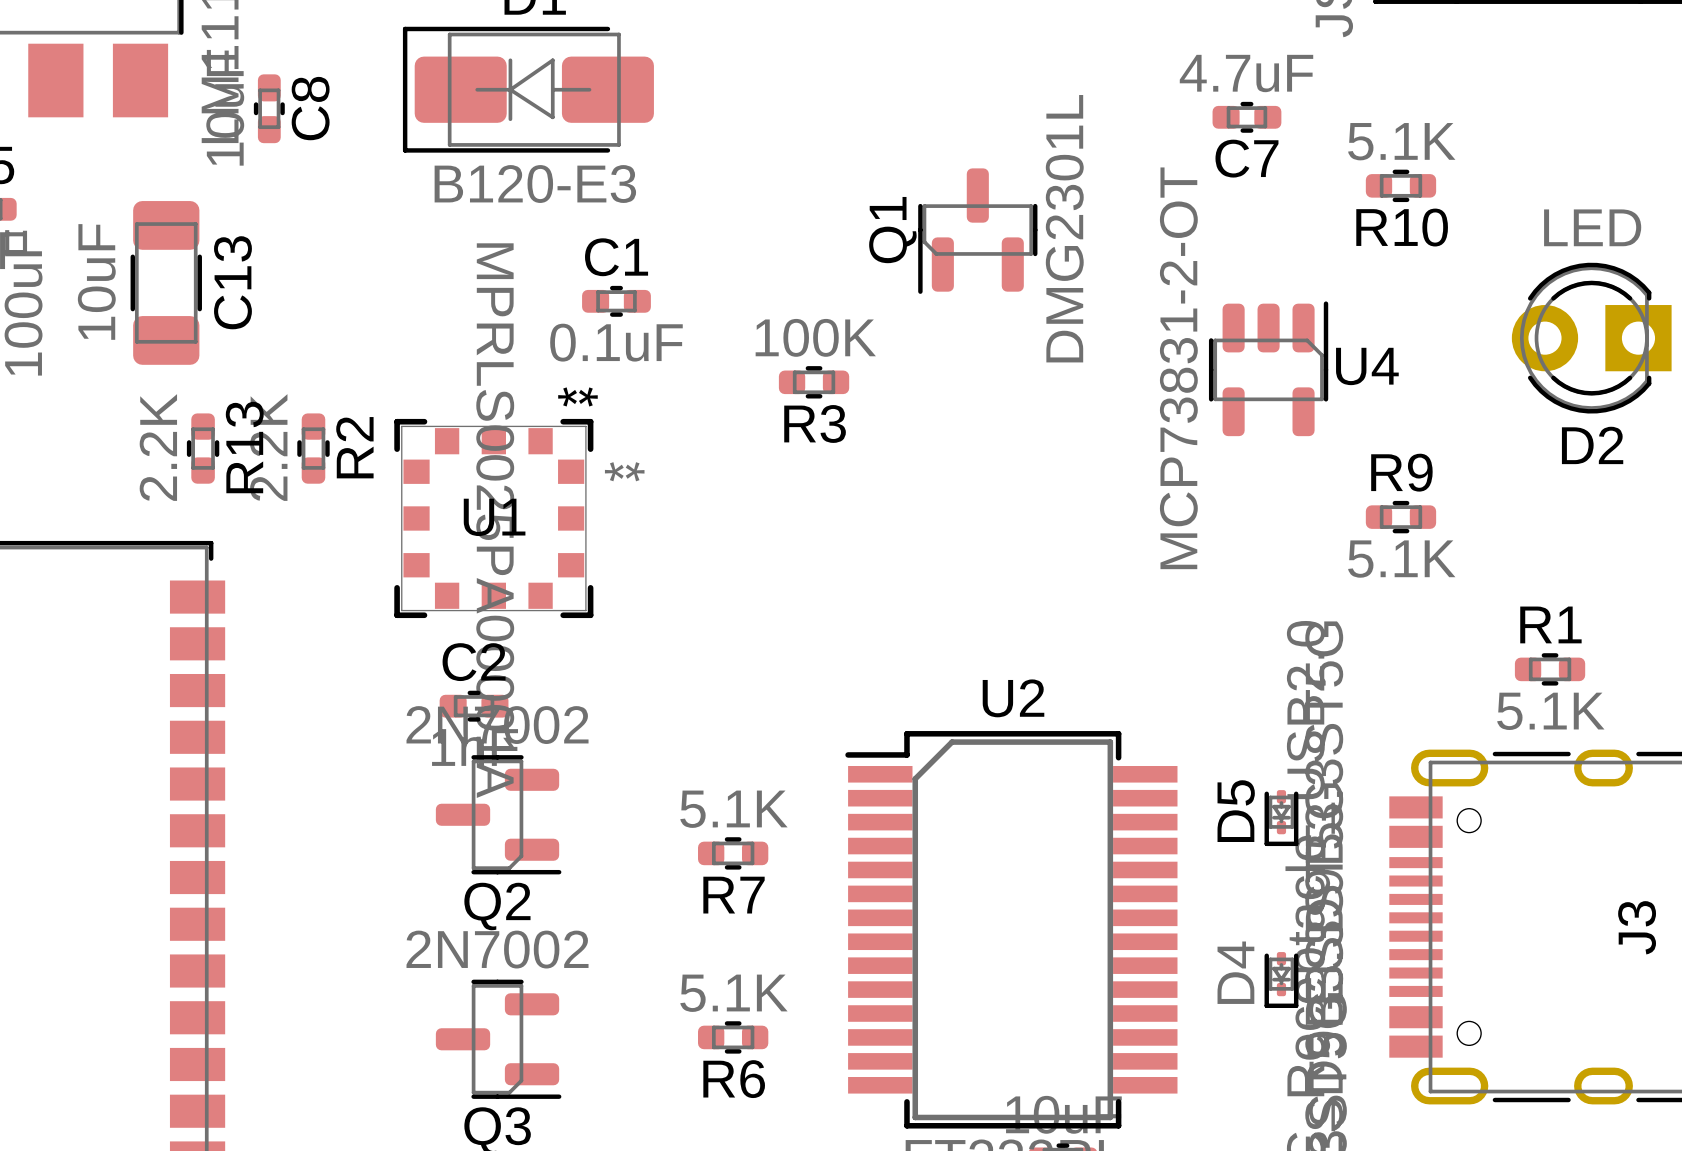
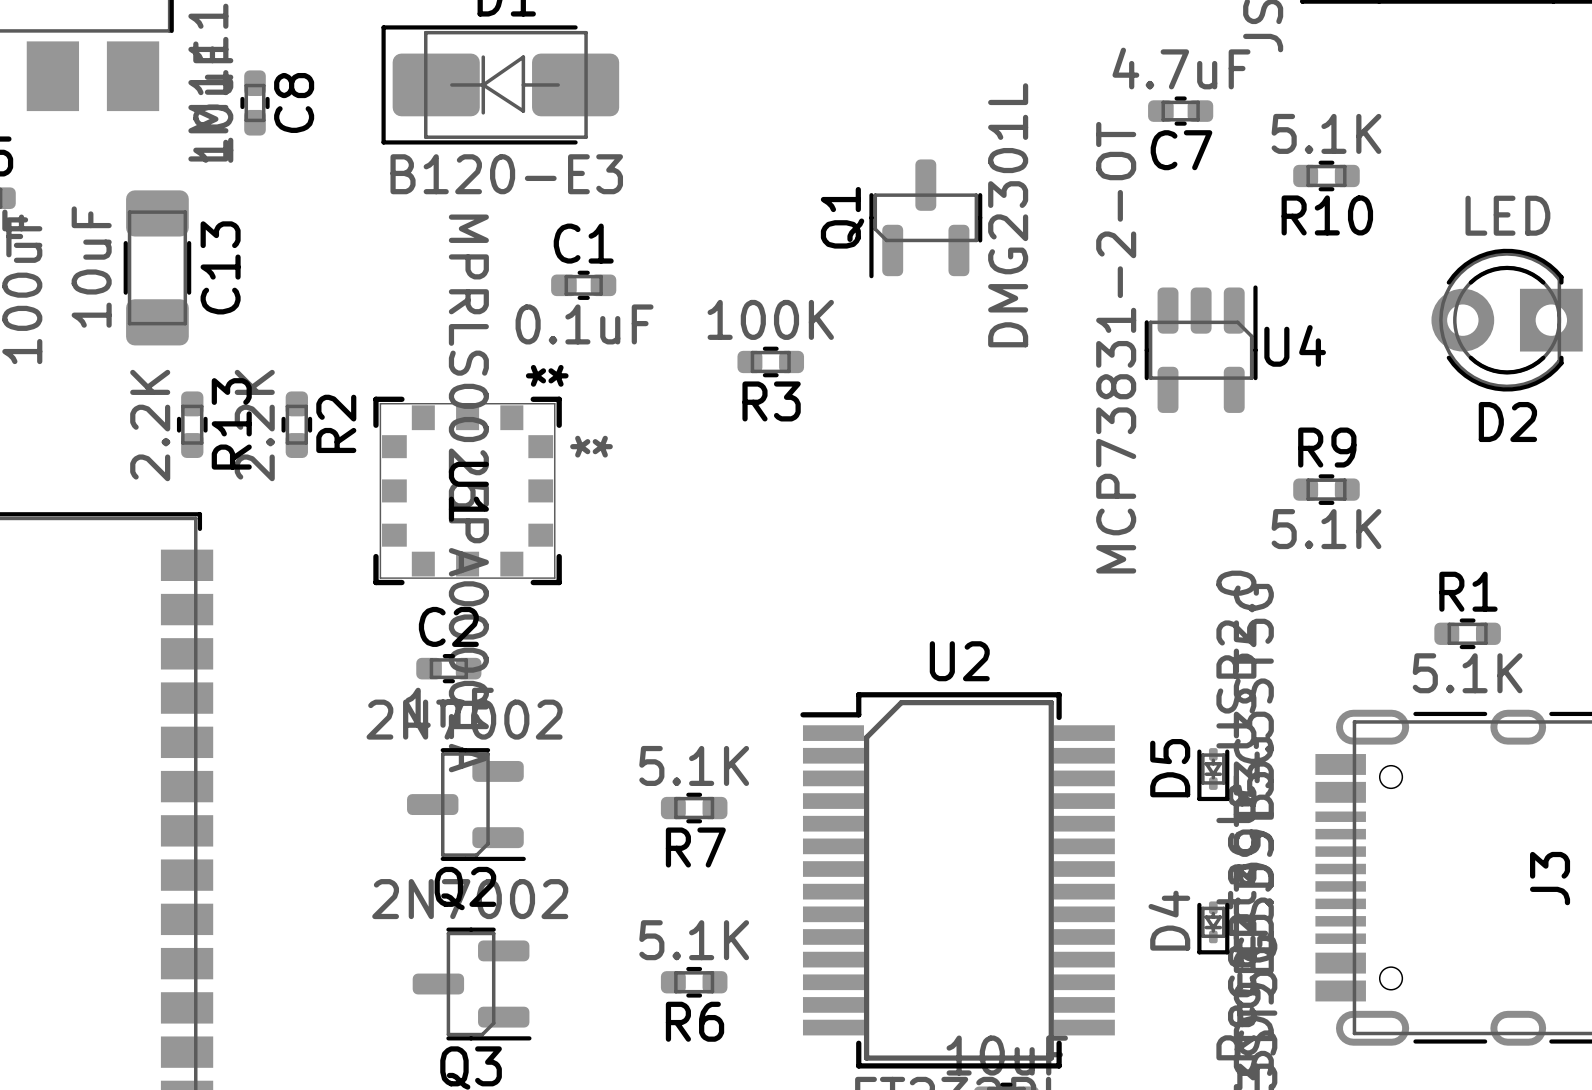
U1 name rotation: 0° (494, 517) -> 90° clockwise (468, 491)
Q2 position: (498, 814) -> (466, 804)

